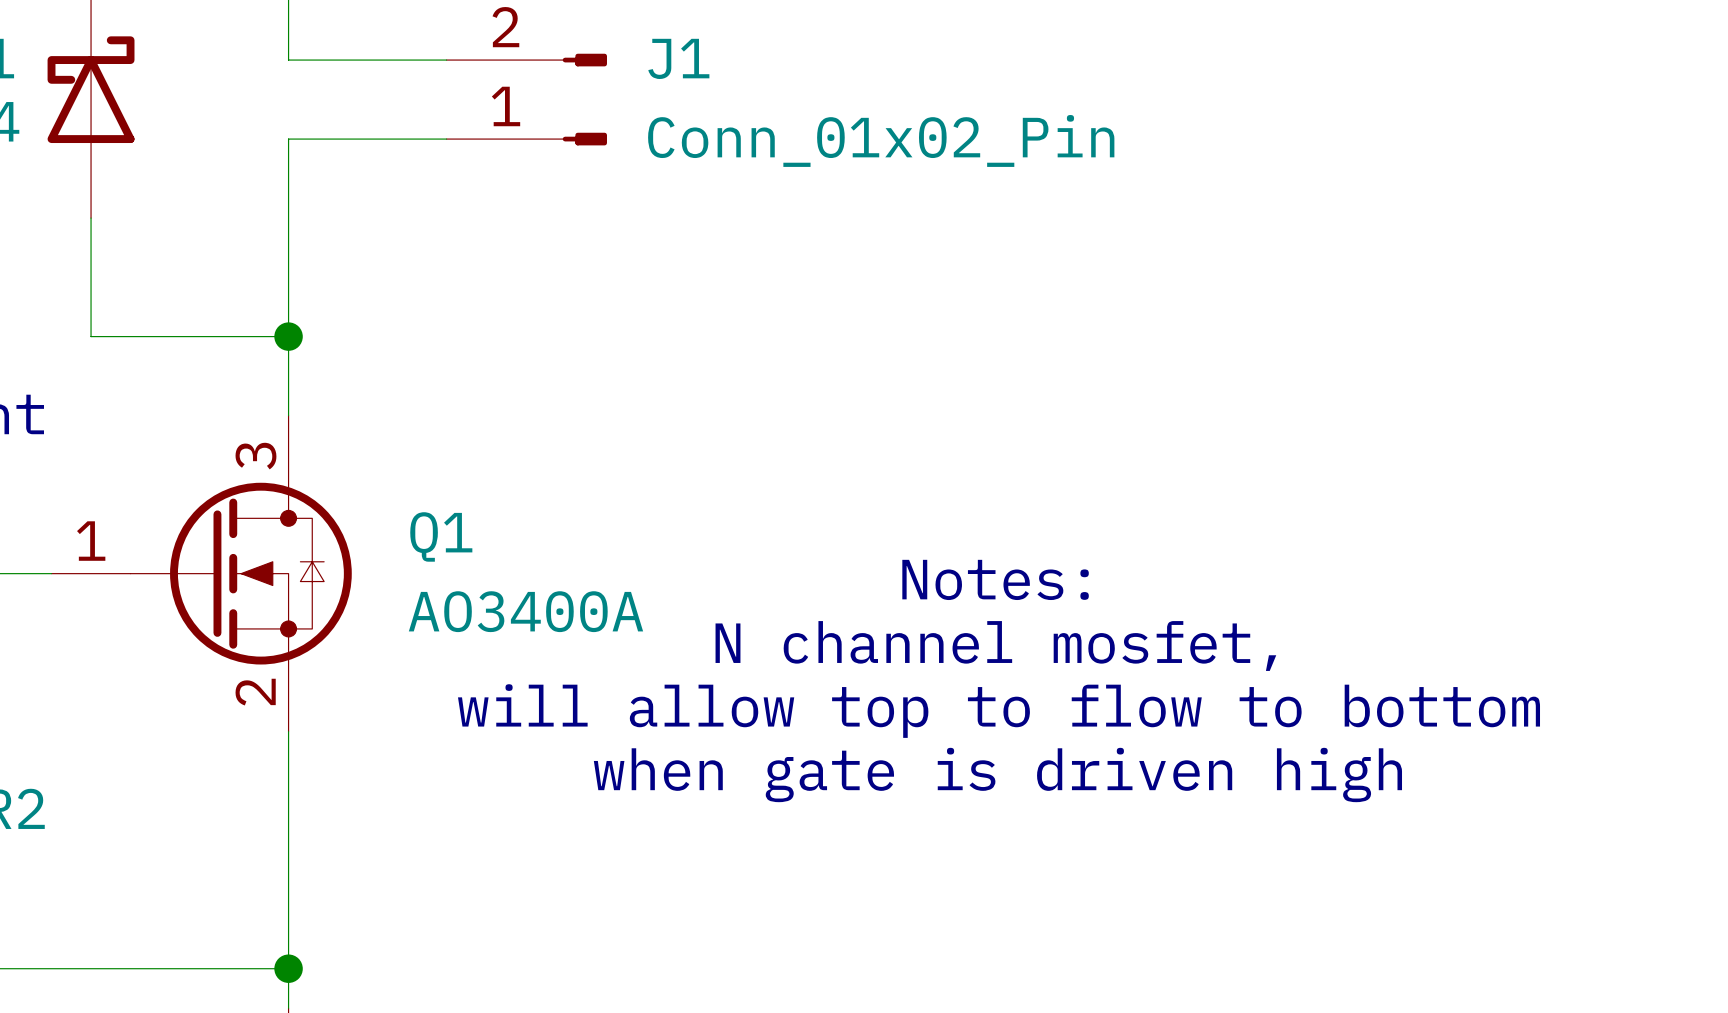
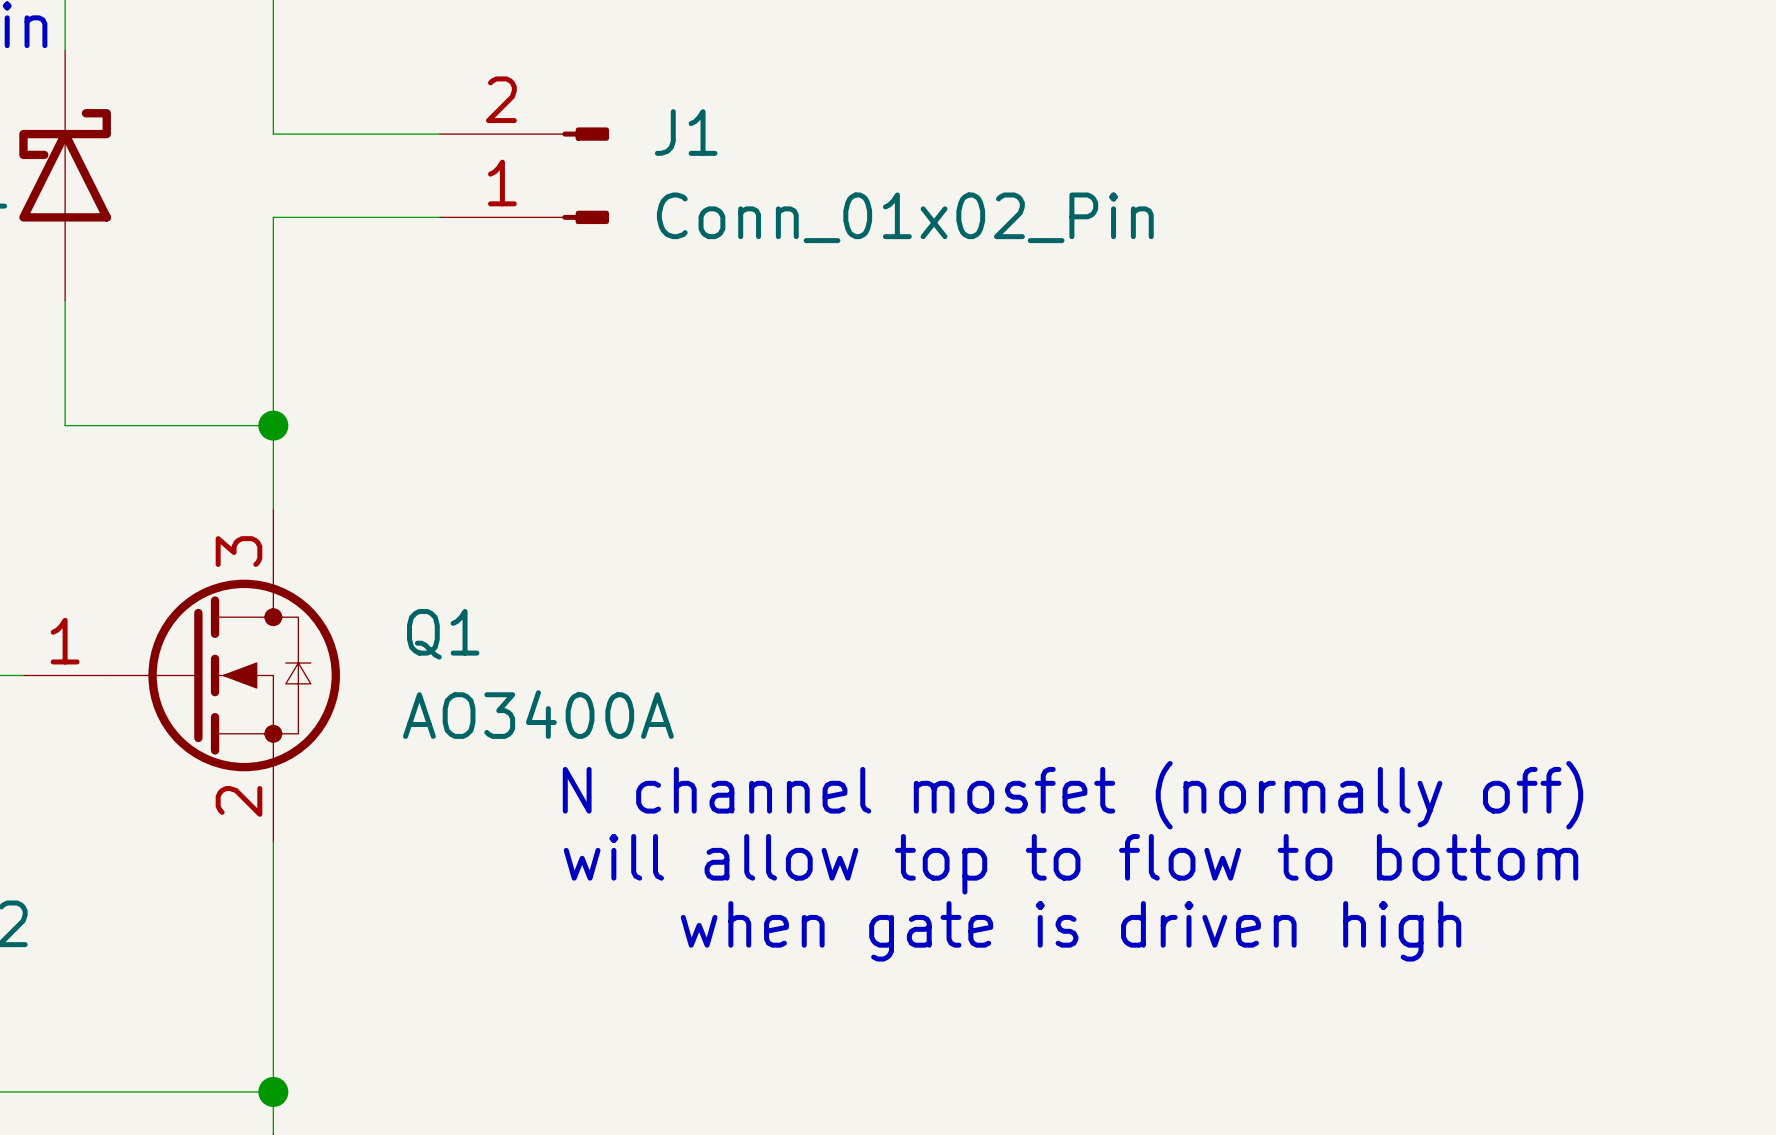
text: Notes: (995, 579) -> none
text: N channel mosfet, (995, 646) -> N channel mosfet (normally off) (1072, 795)
text position: will allow top to flow to bottom (999, 711) -> will allow top to flow to bottom (1070, 864)
text position: when gate is driven high (997, 775) -> when gate is driven high (1070, 931)

